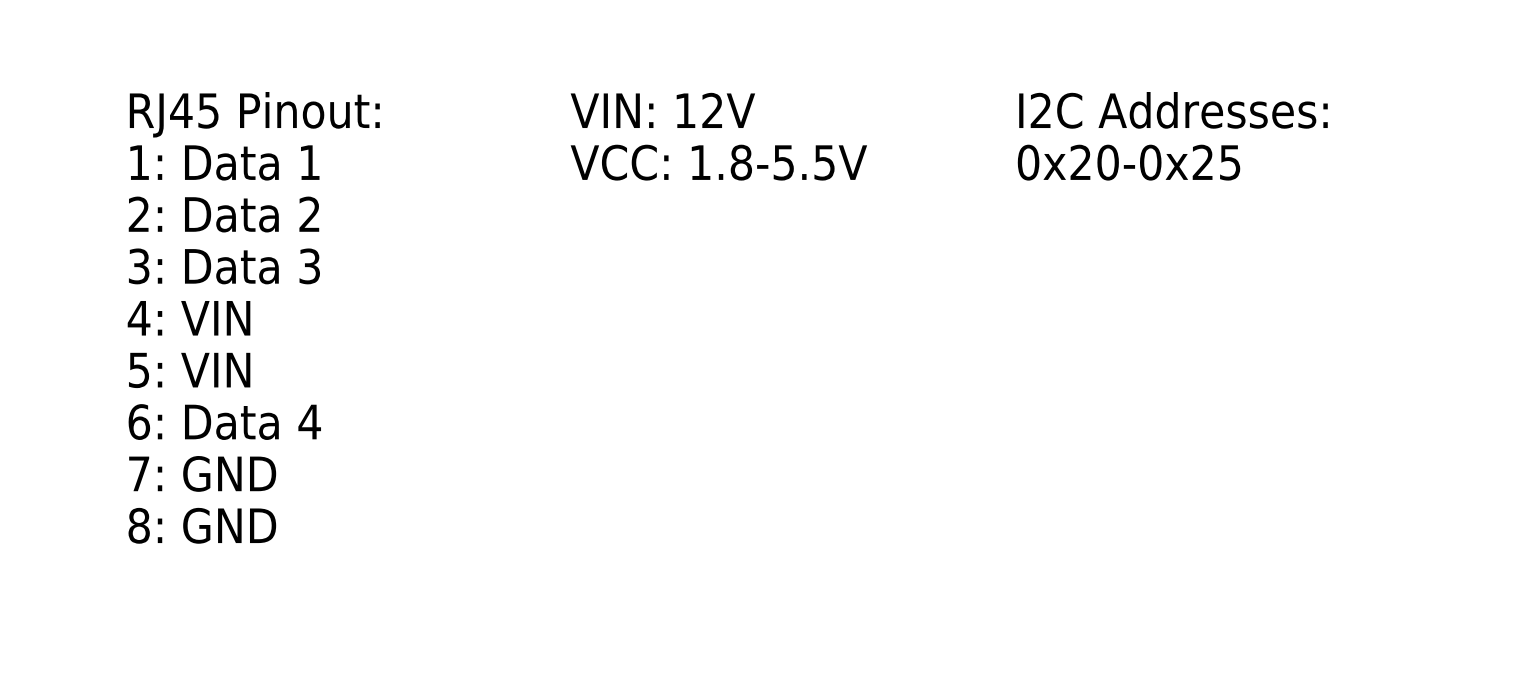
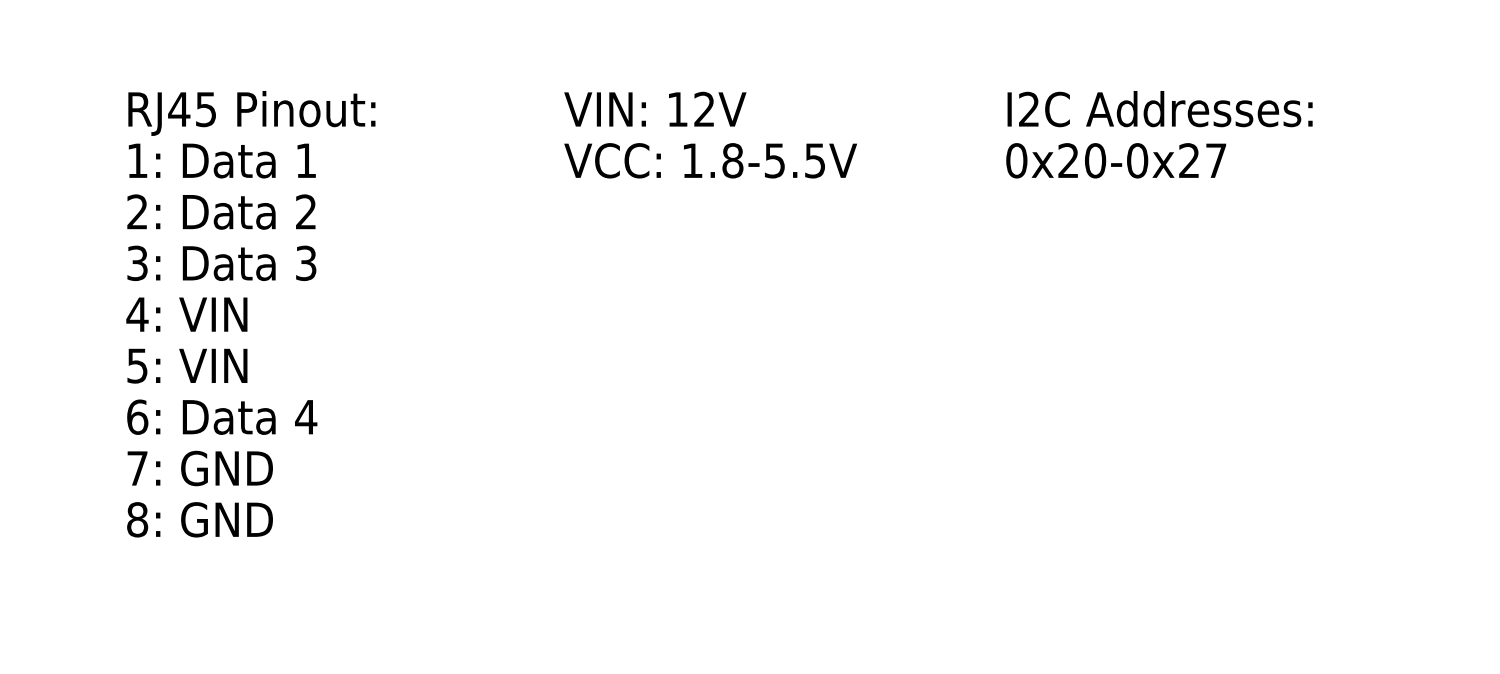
text: 0x20-0x25 (1129, 162) -> 0x20-0x27 (1116, 160)

